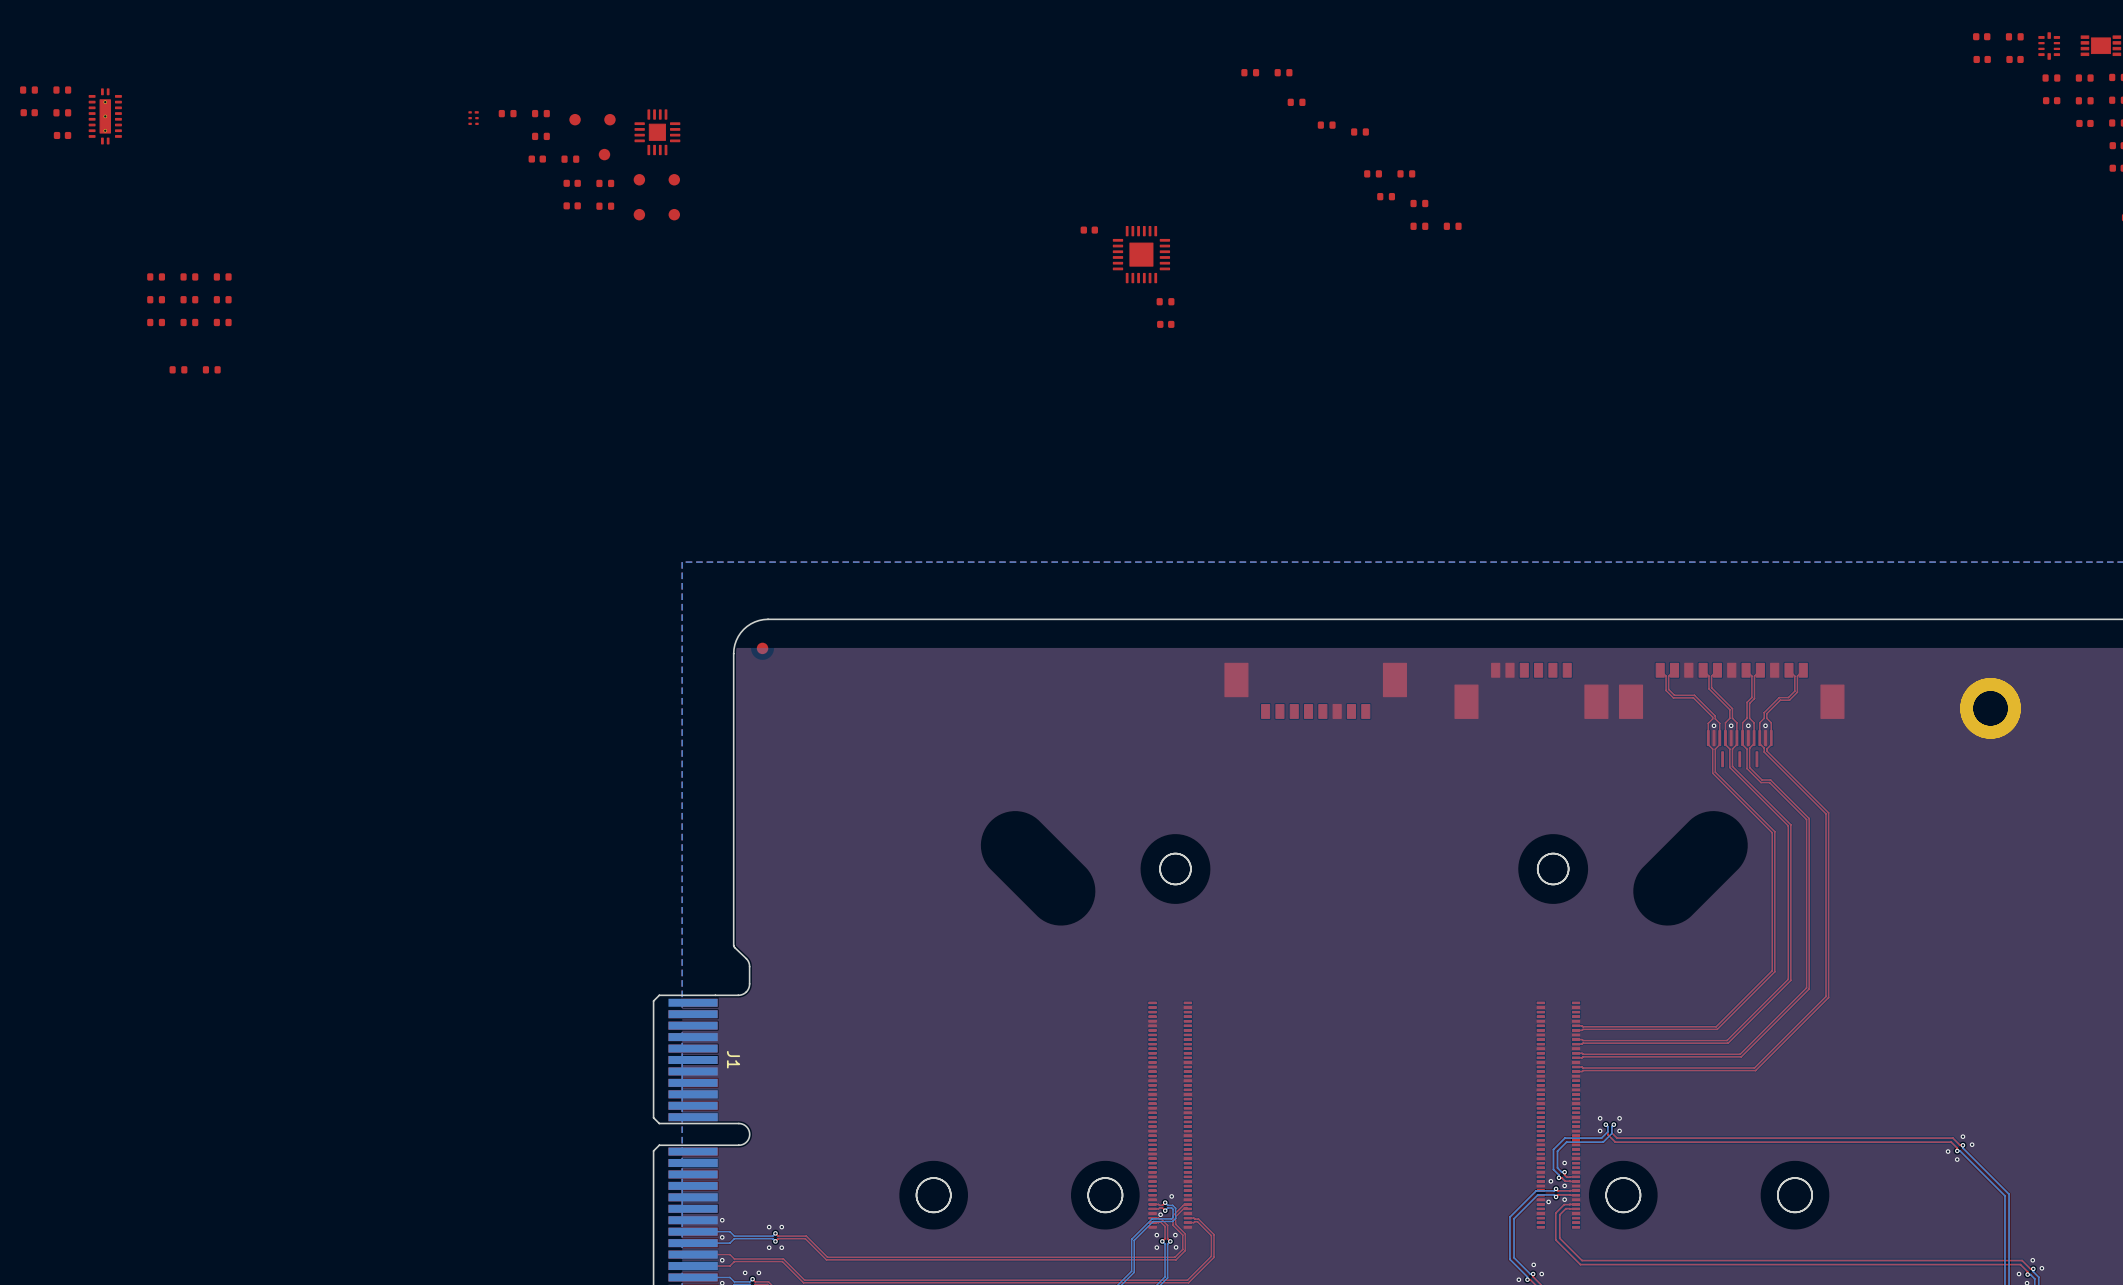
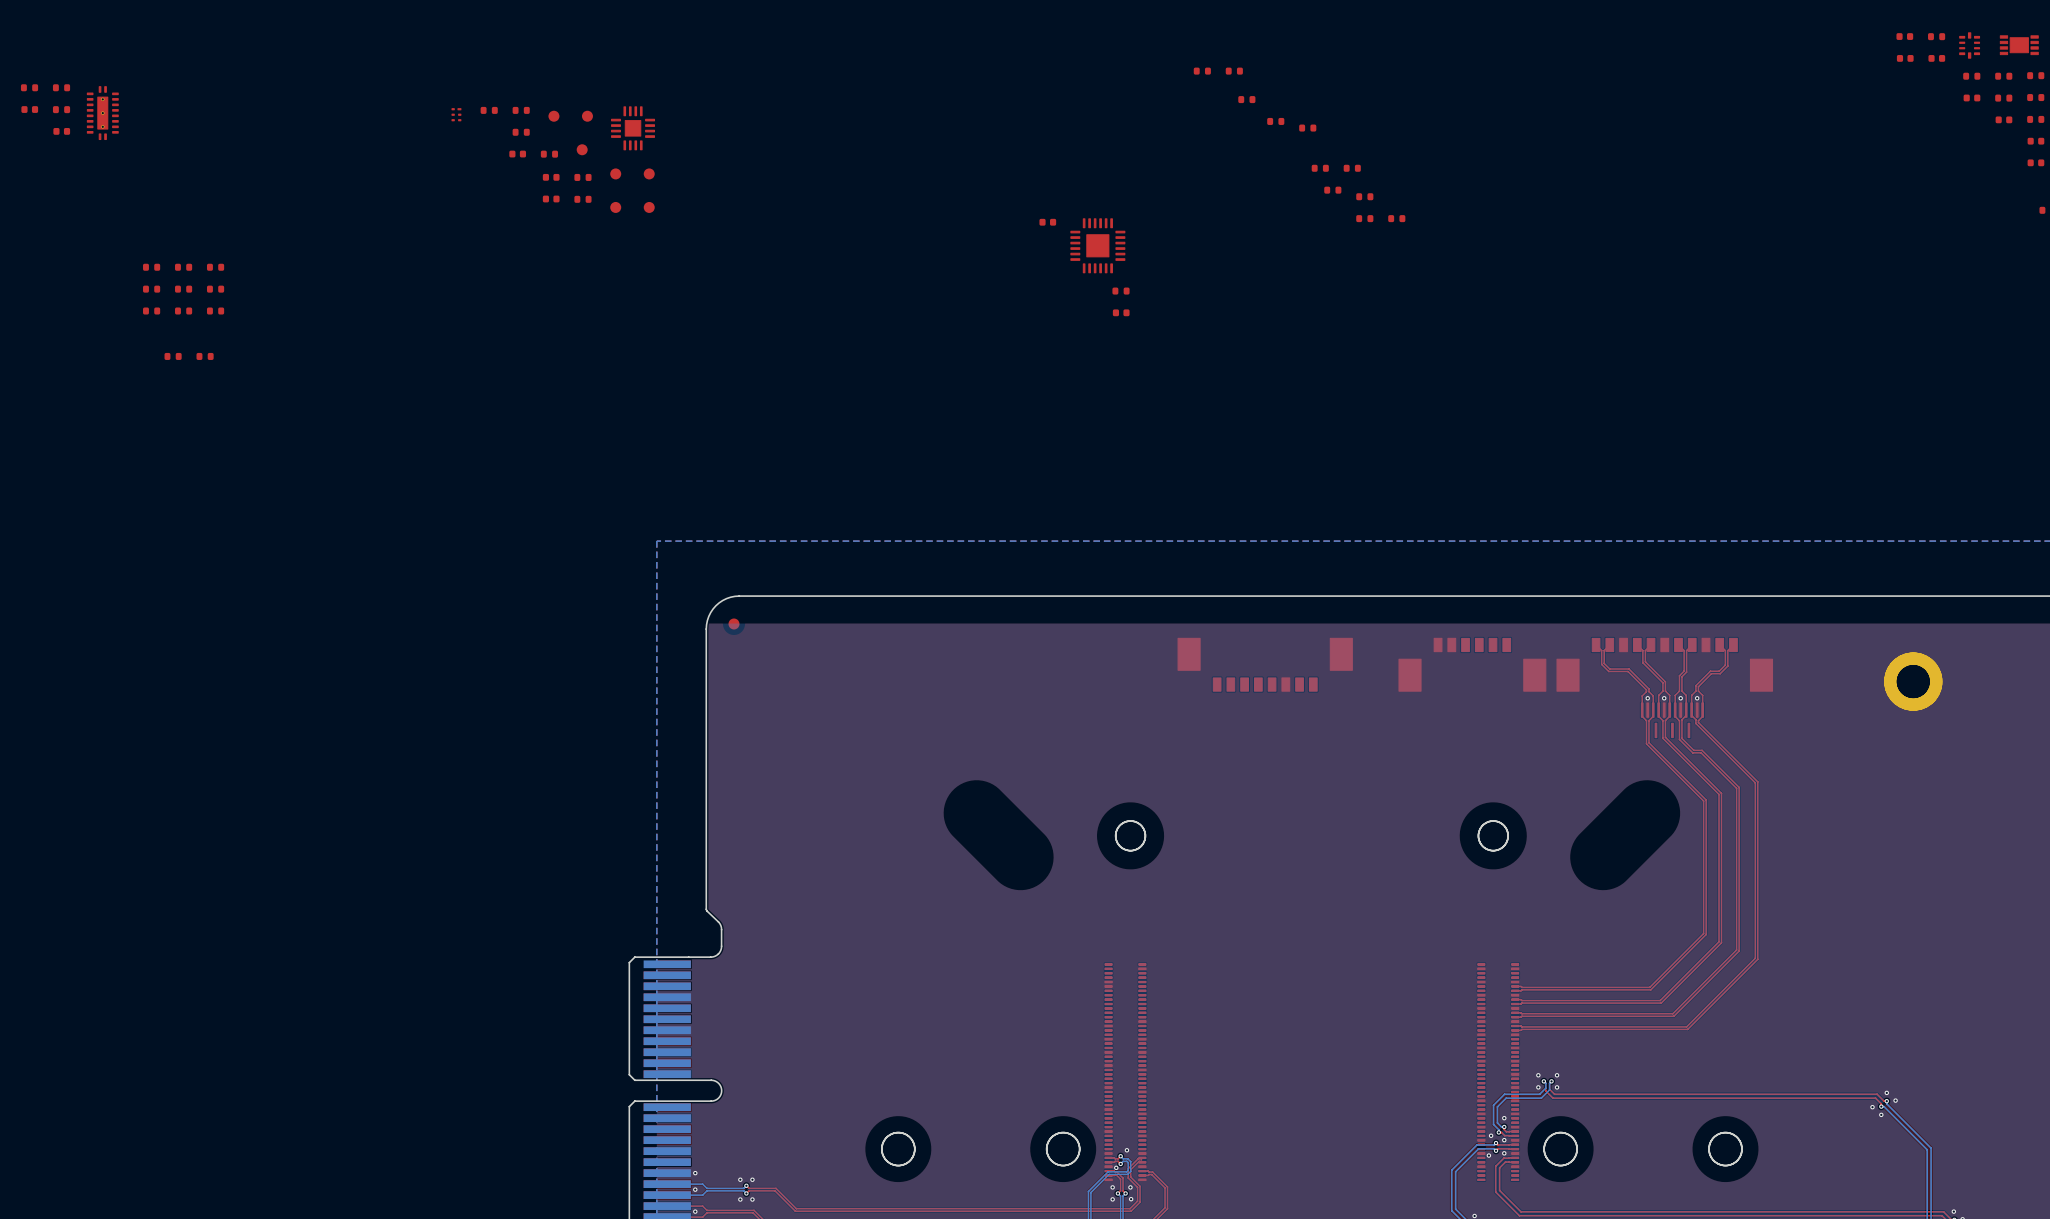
J1 name: J1 (733, 1059) -> none

